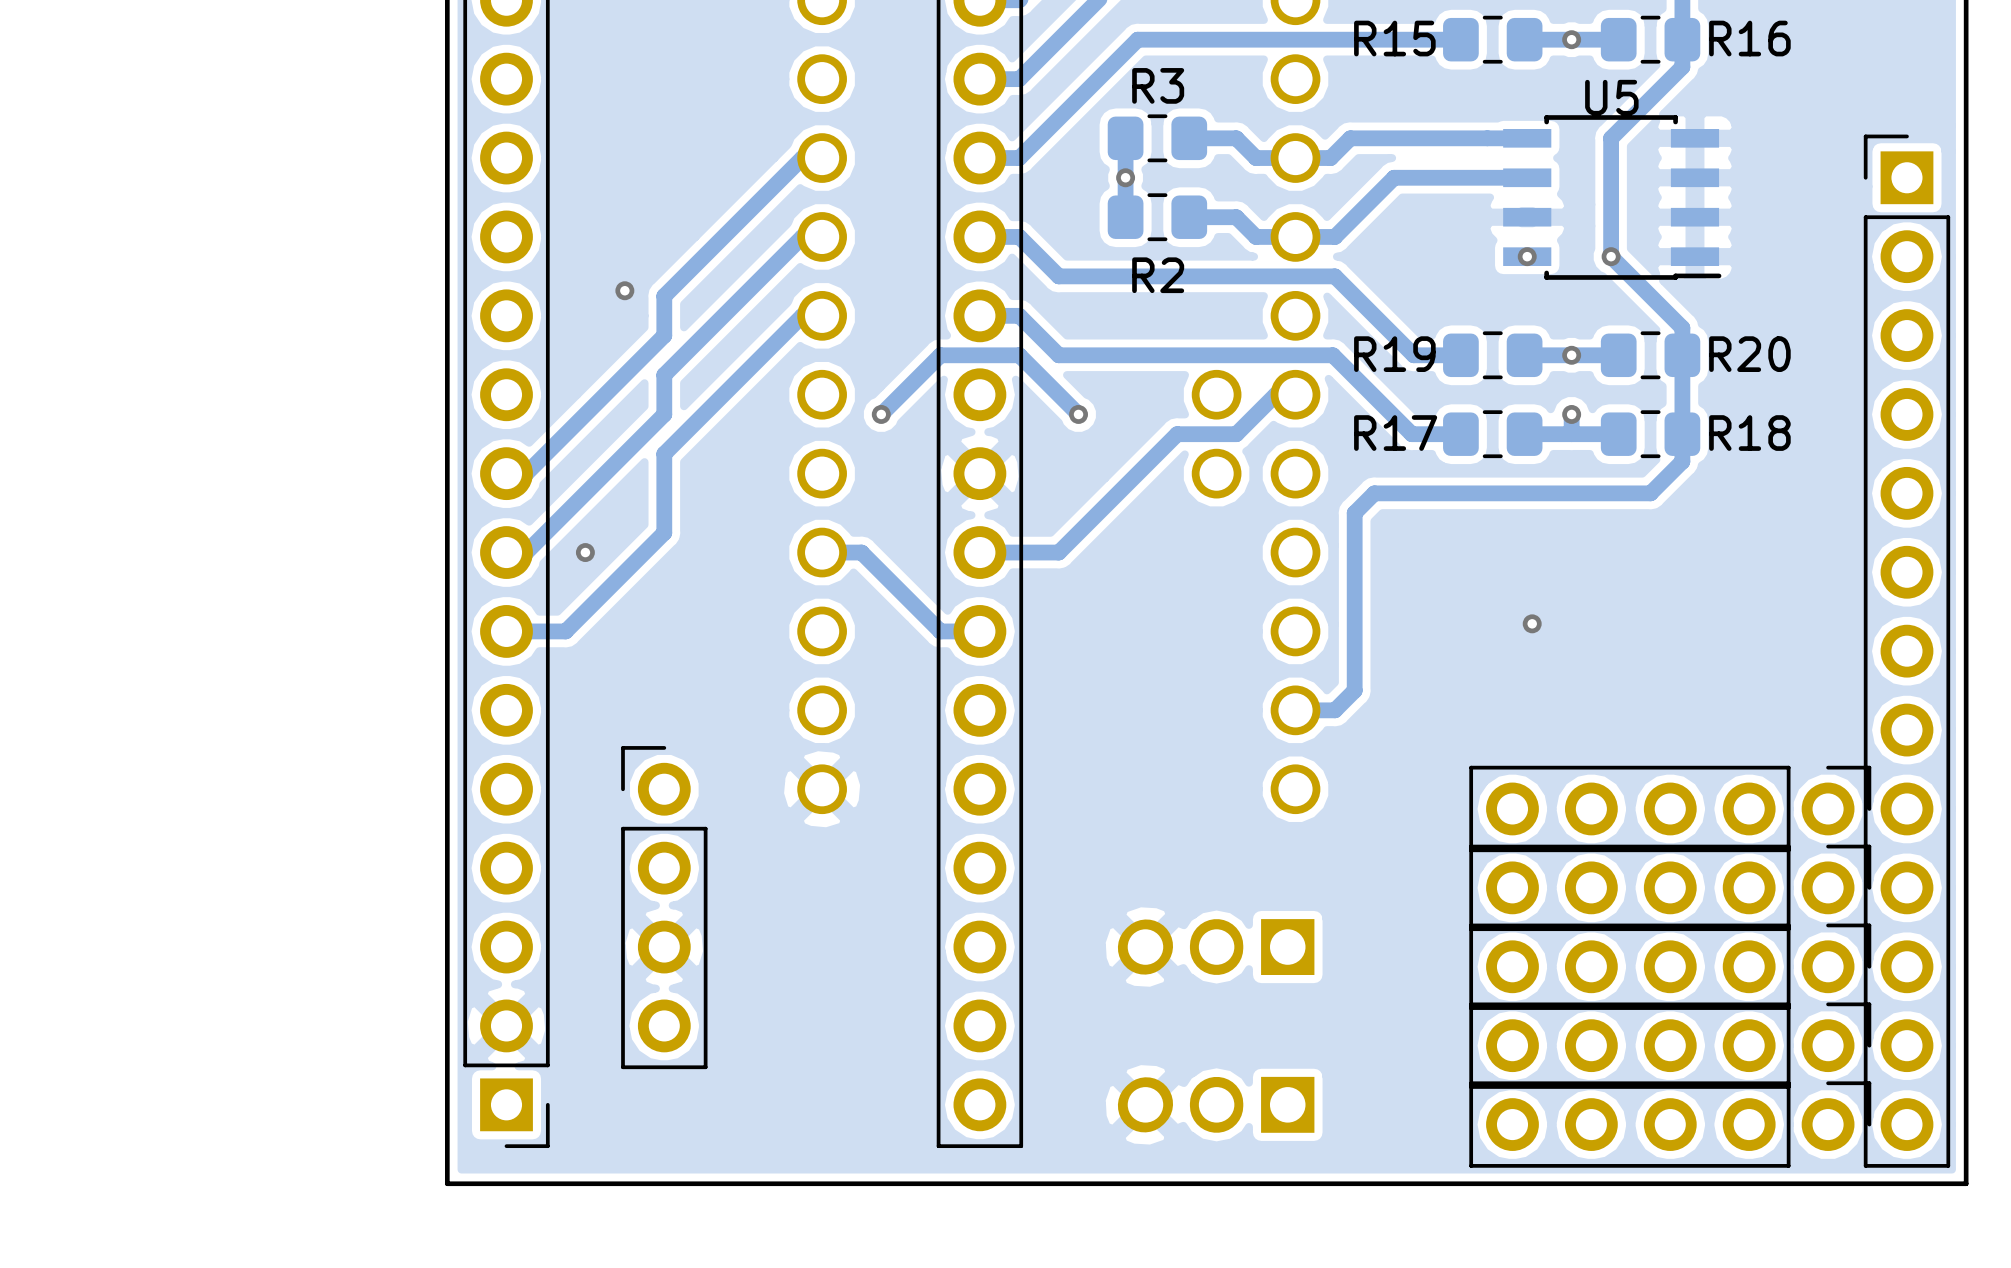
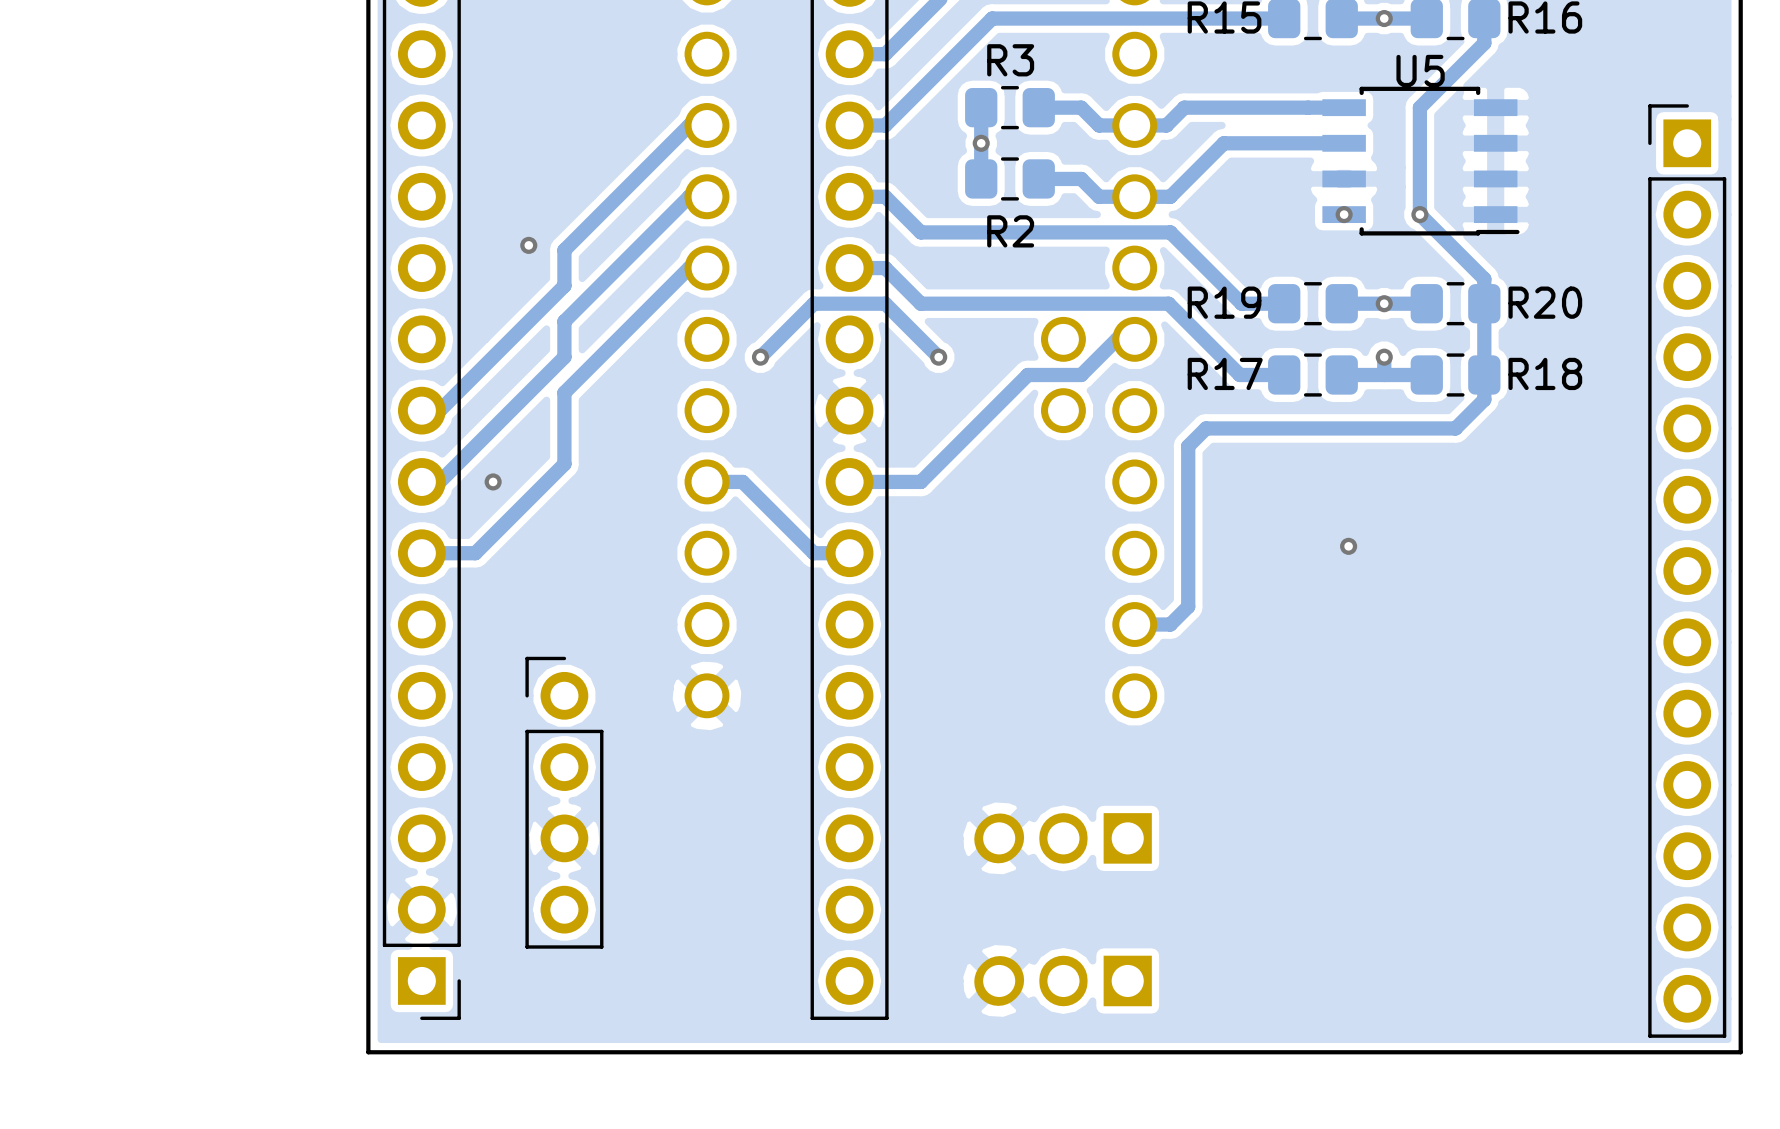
part: (1670, 808) -> none
part: (1670, 887) -> none
part: (1670, 966) -> none
part: (1670, 1045) -> none
part: (1670, 1124) -> none

